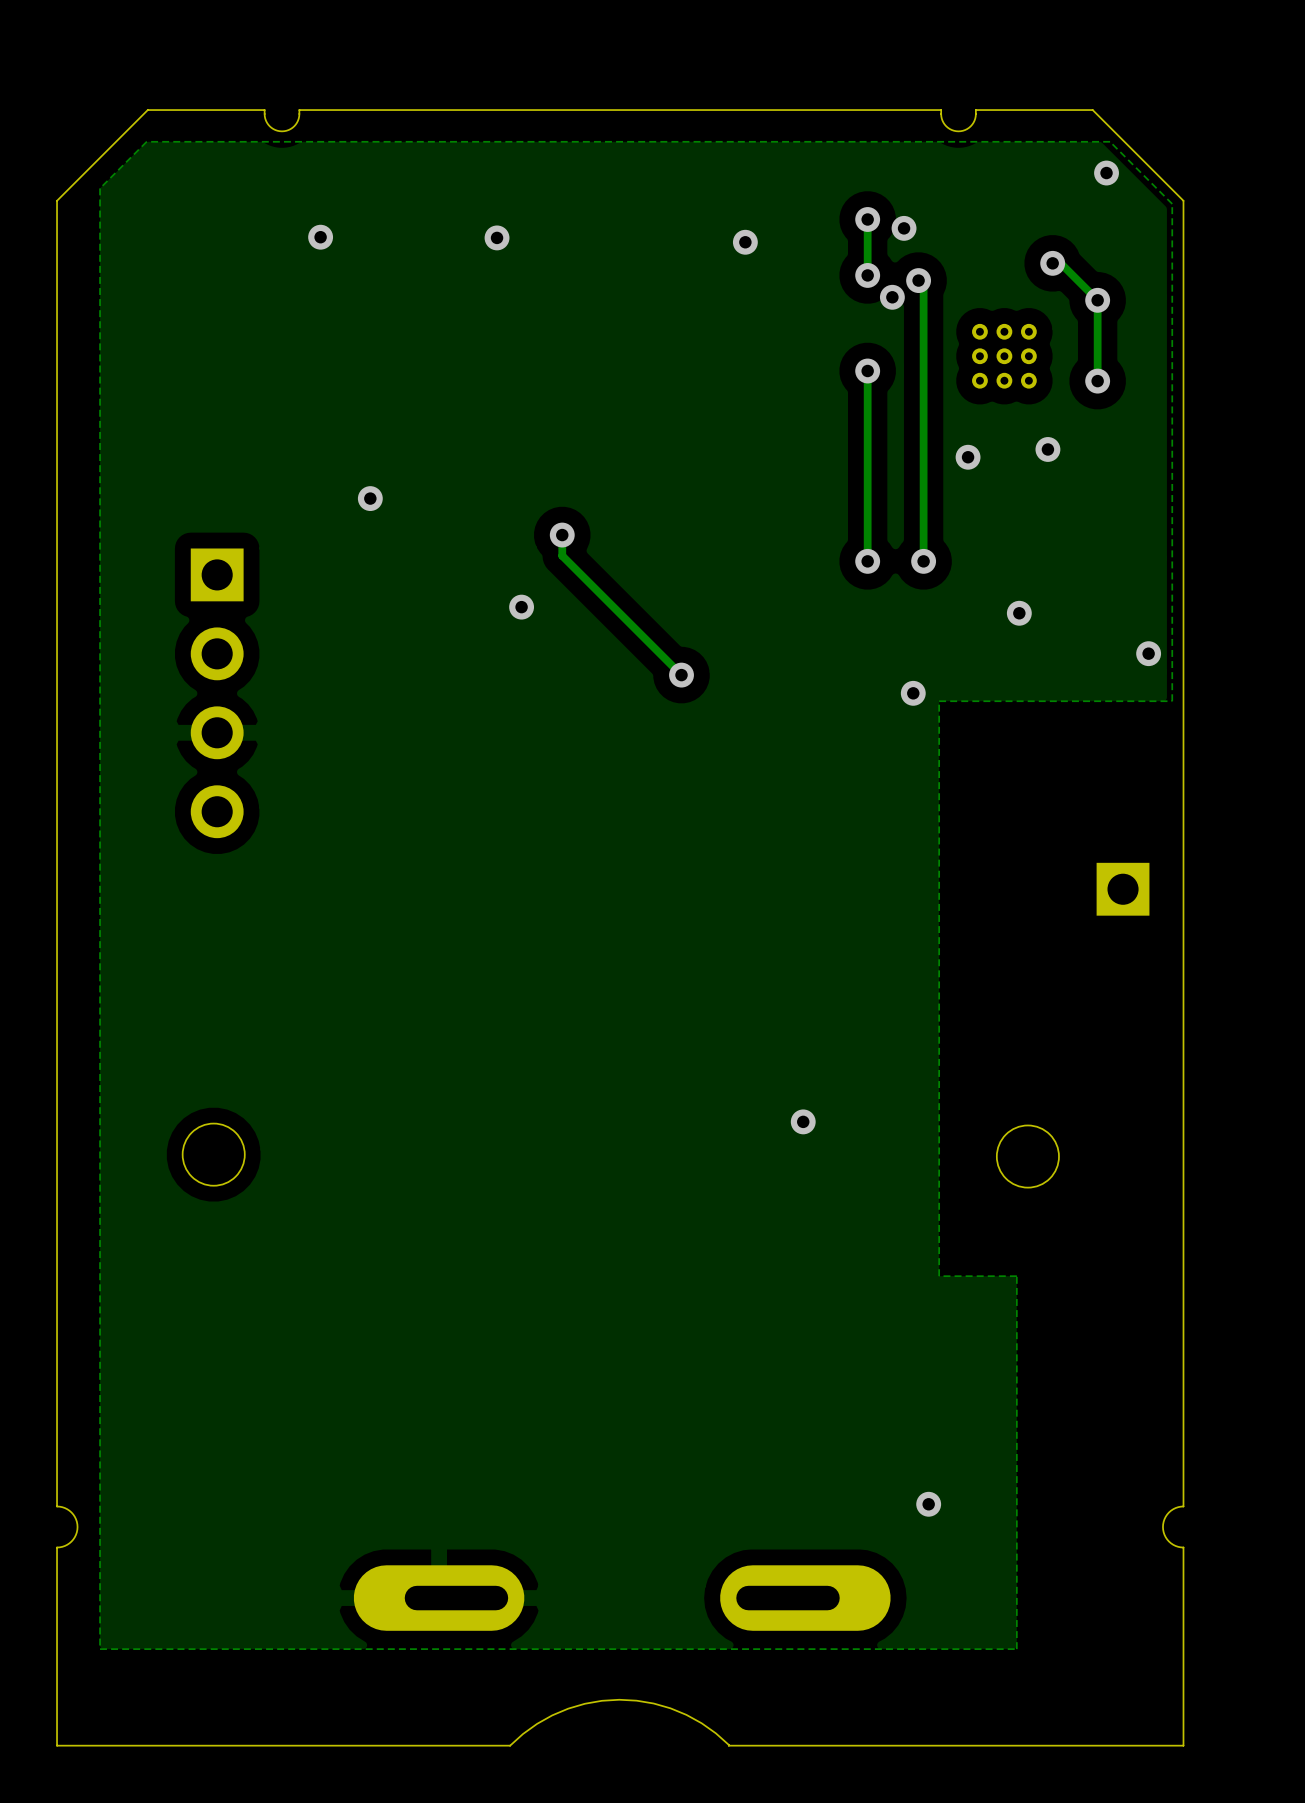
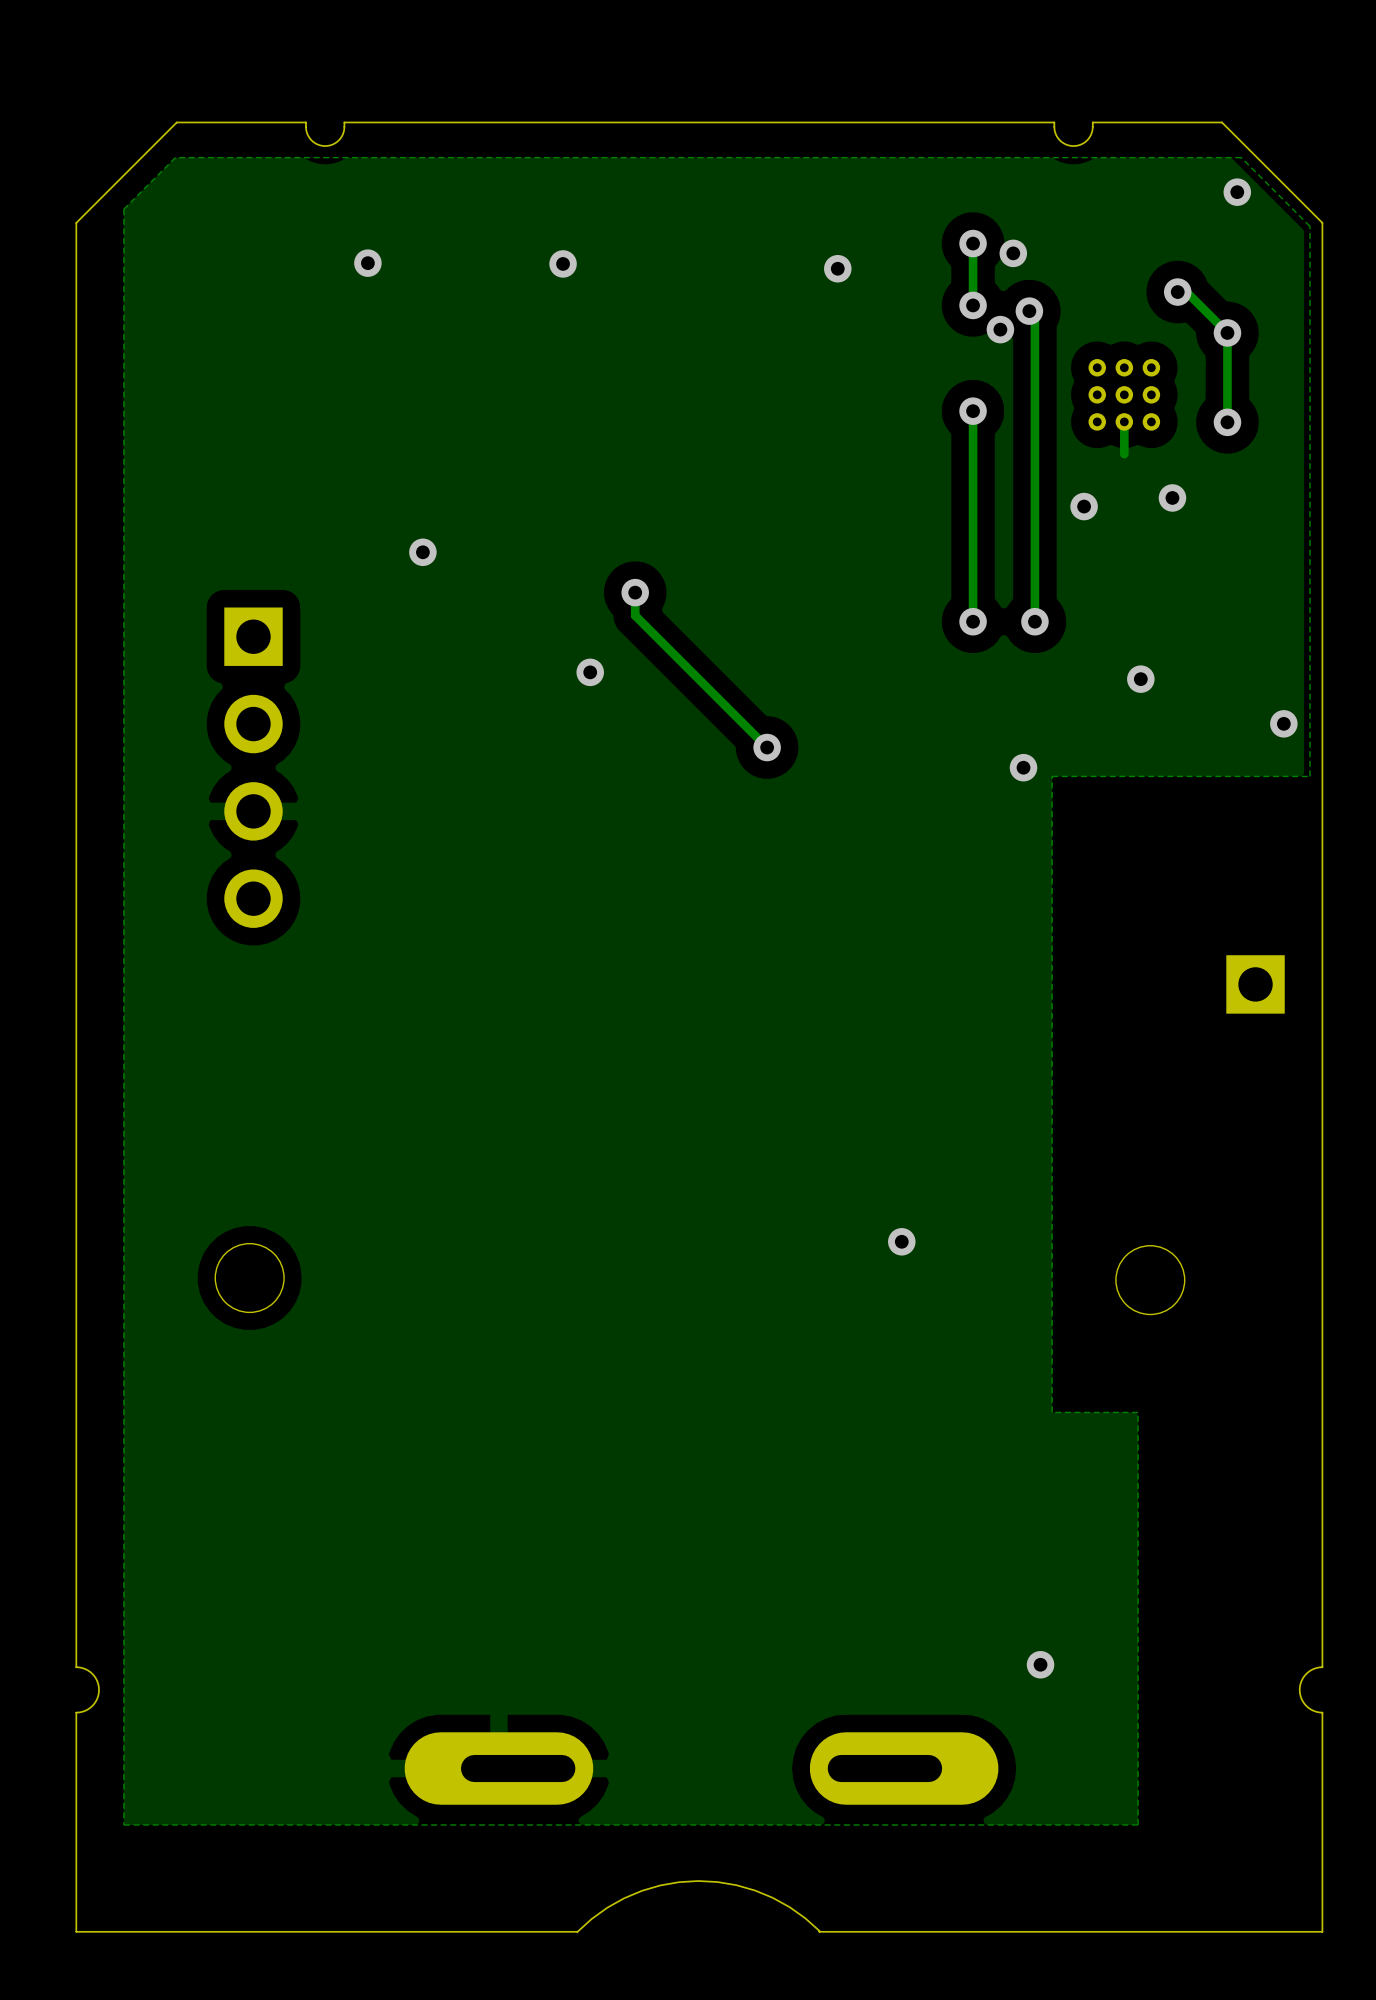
track: none -> (1124, 421) (1124, 454)

